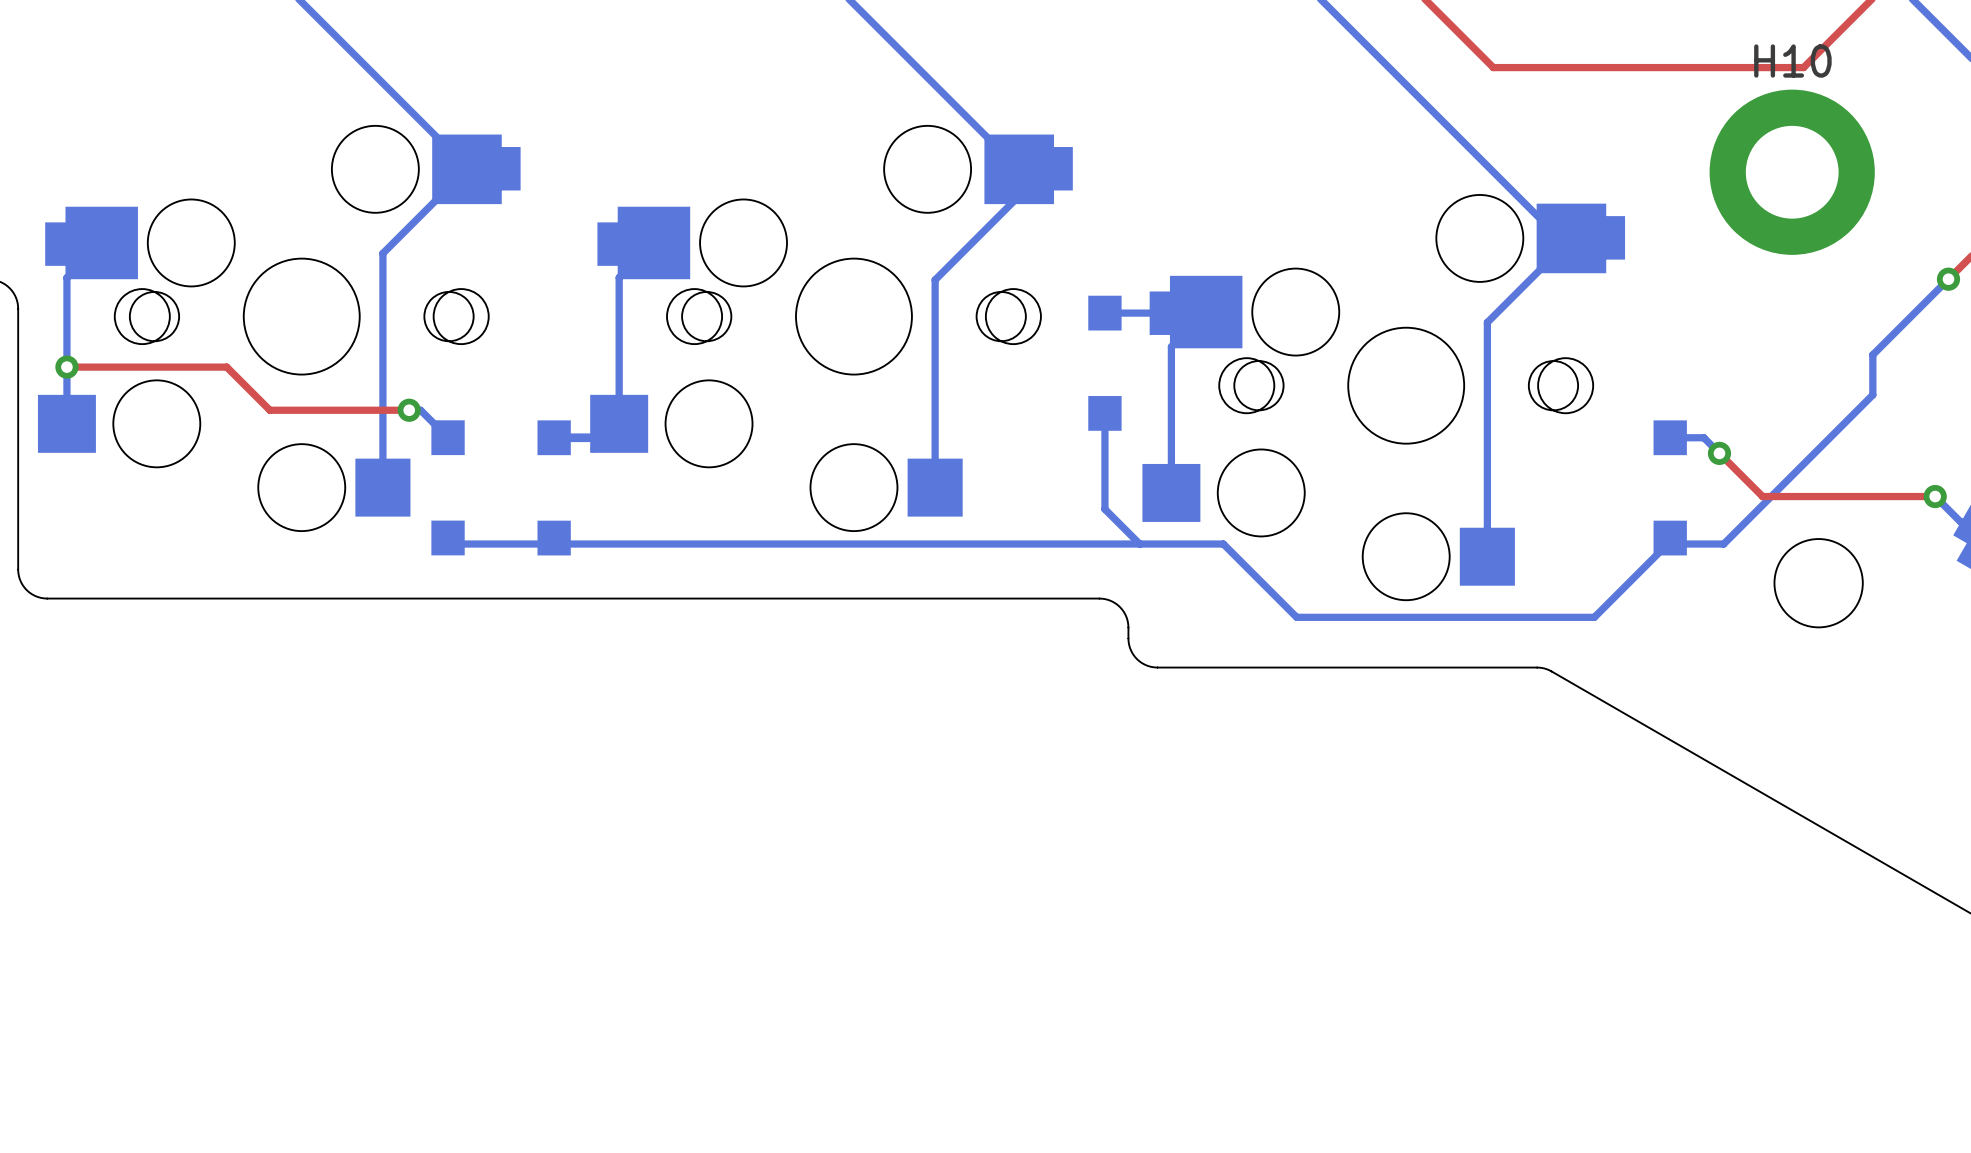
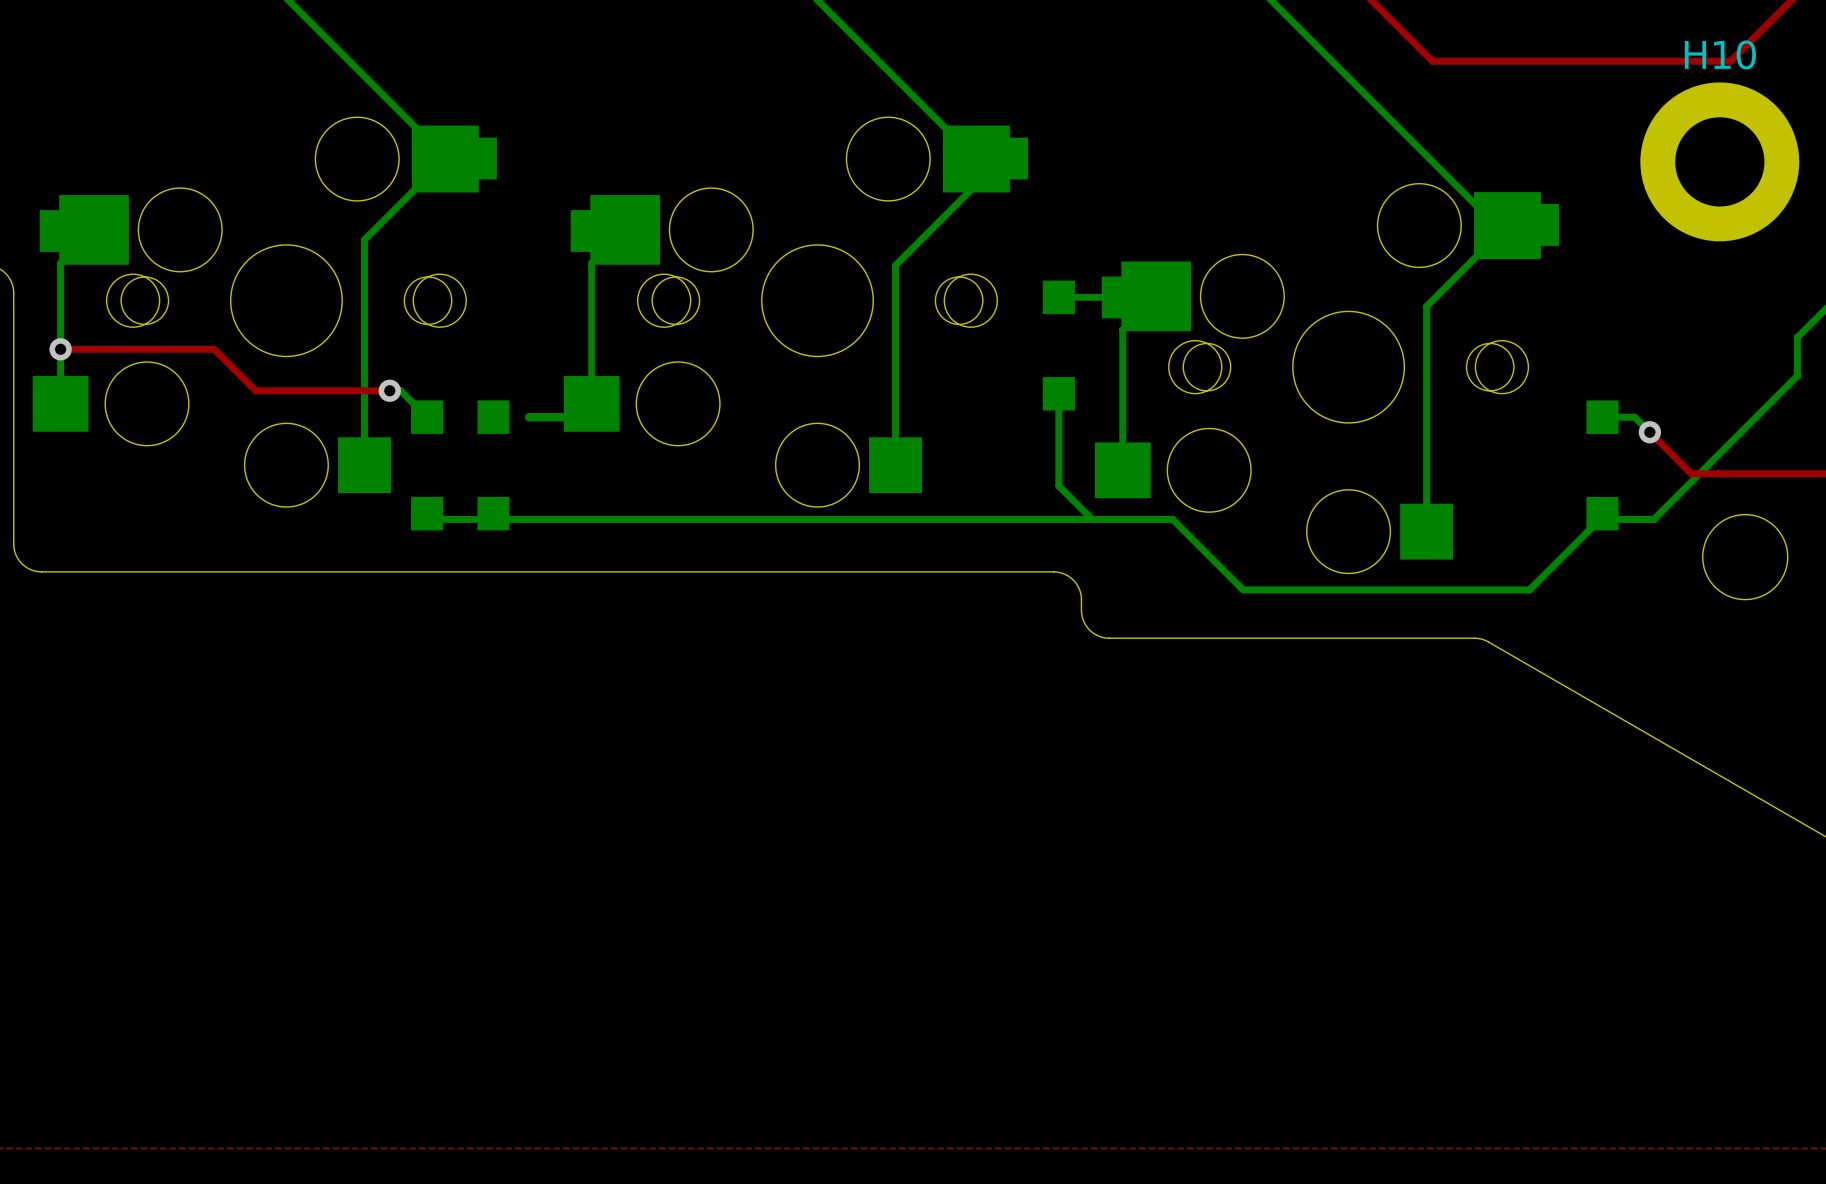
part position: (554, 487) -> (493, 465)

